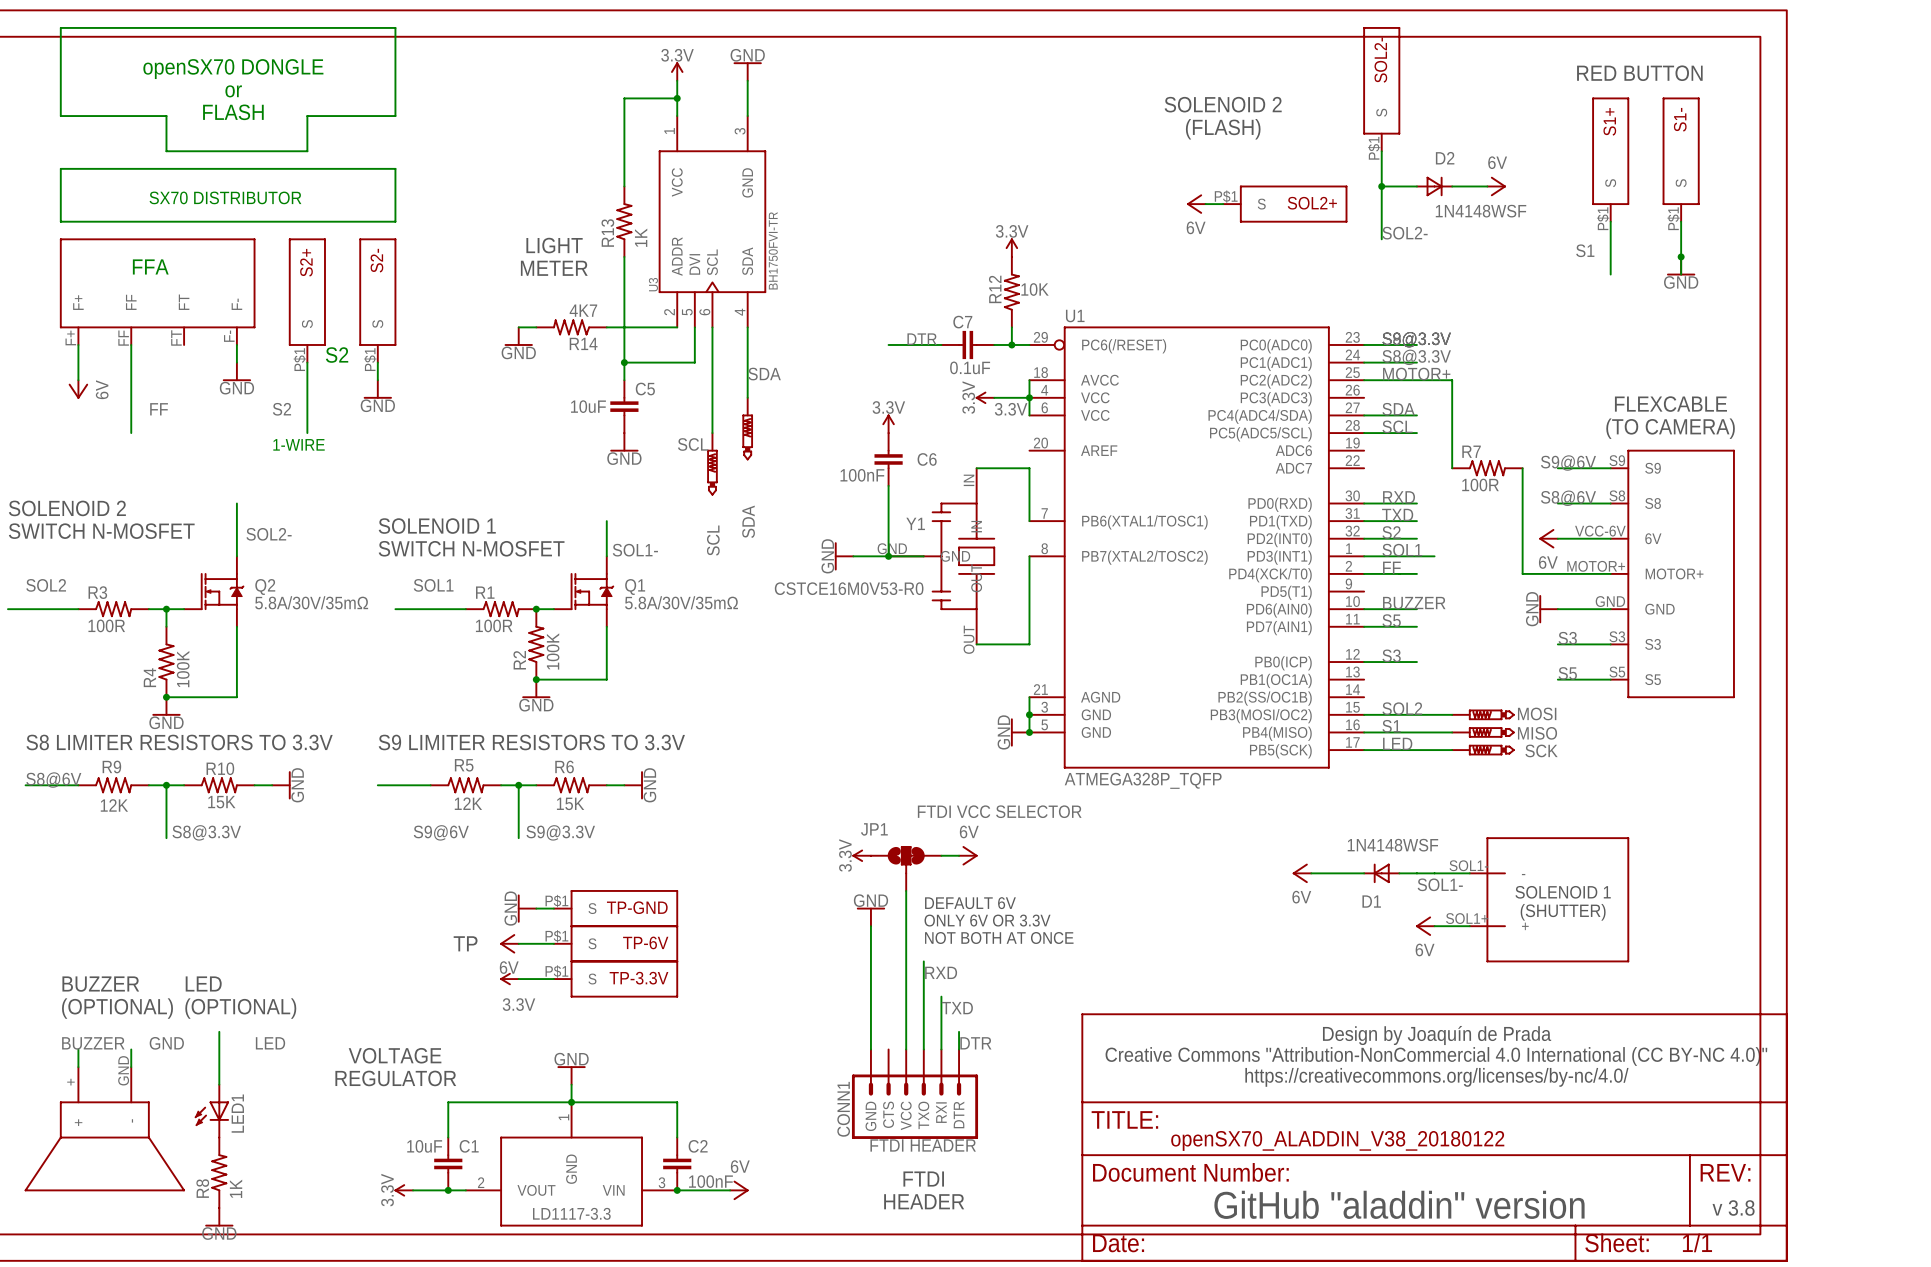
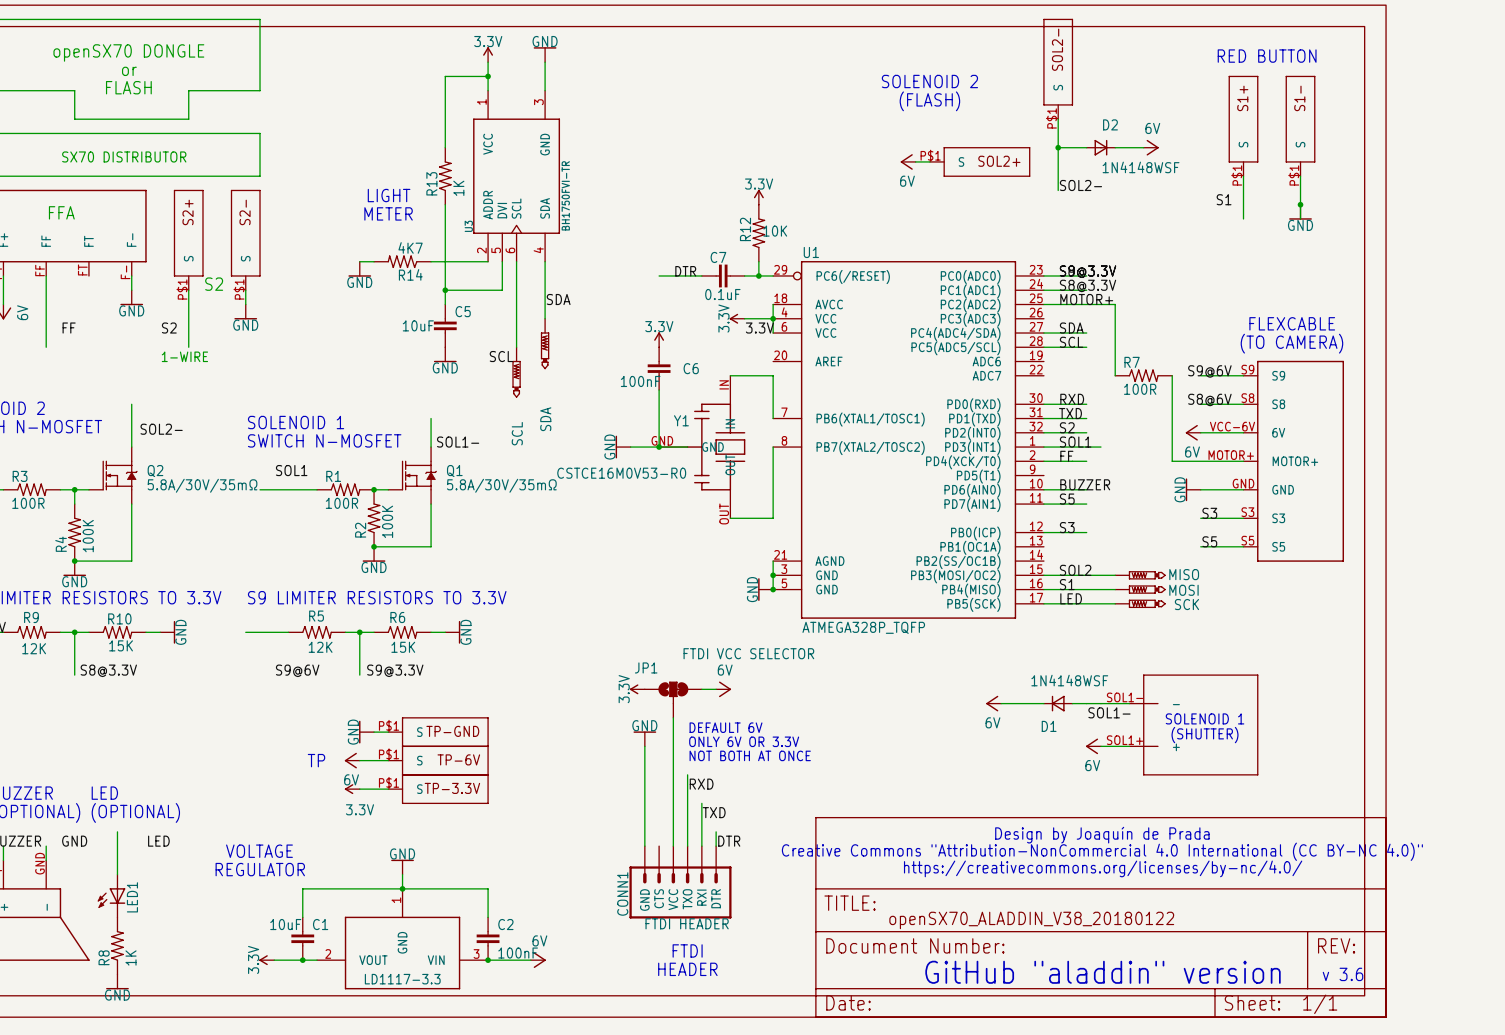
MOSI name: MOSI (1537, 713) -> MISO (1184, 574)
MISO name: MISO (1537, 733) -> MOSI (1183, 590)
text: v 3.8 (1733, 1207) -> v 3.6 (1343, 974)

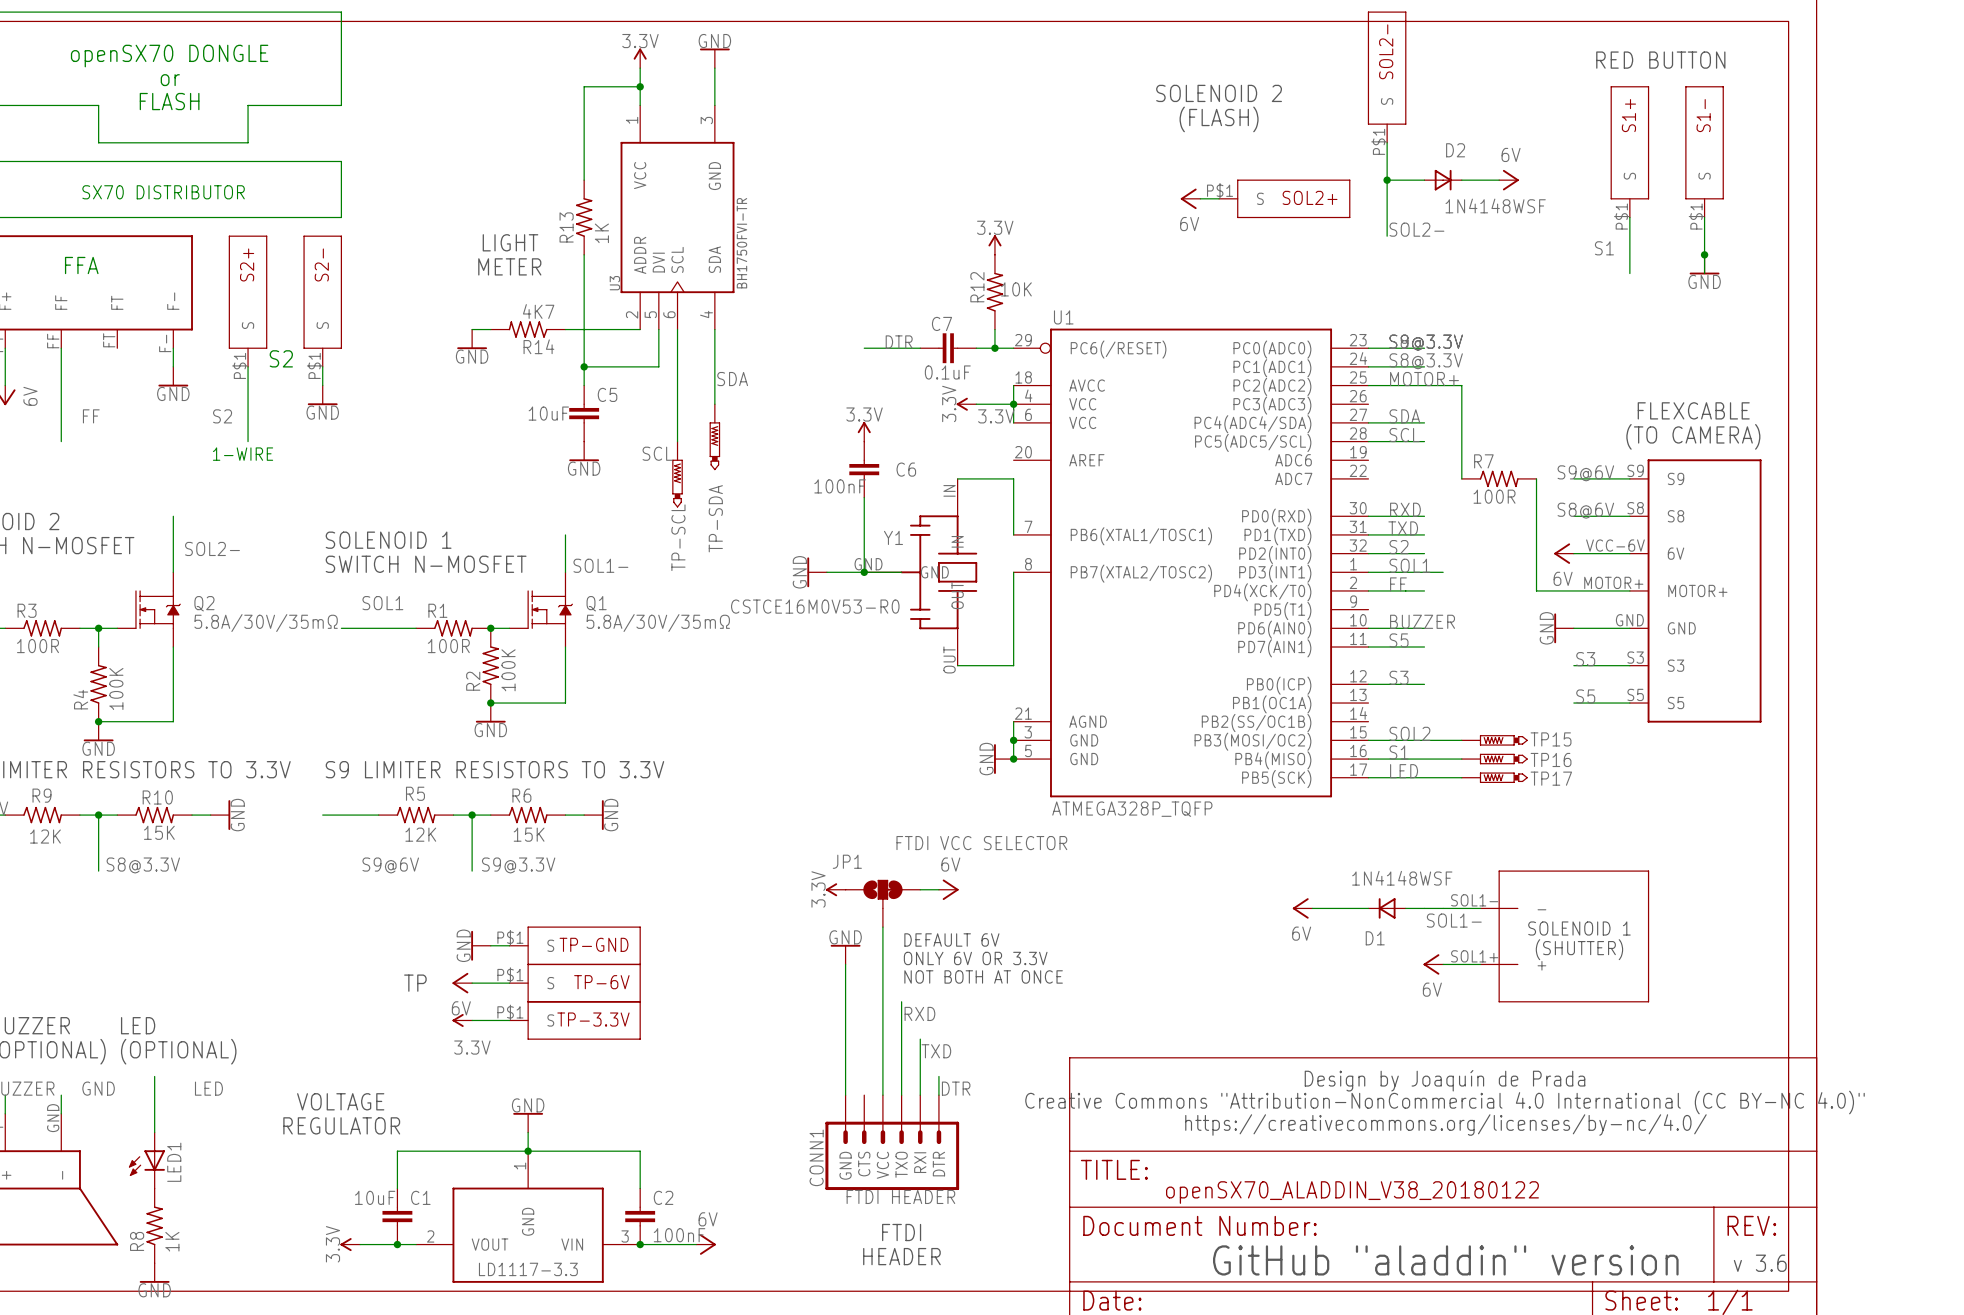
SDA name: SDA (545, 419) -> TP-SDA (715, 518)
SCL name: SCL (517, 433) -> TP-SCL (678, 537)
MISO name: MISO (1184, 574) -> TP15 (1551, 739)
MOSI name: MOSI (1183, 590) -> TP16 (1551, 759)
SCK name: SCK (1186, 604) -> TP17 (1551, 778)

